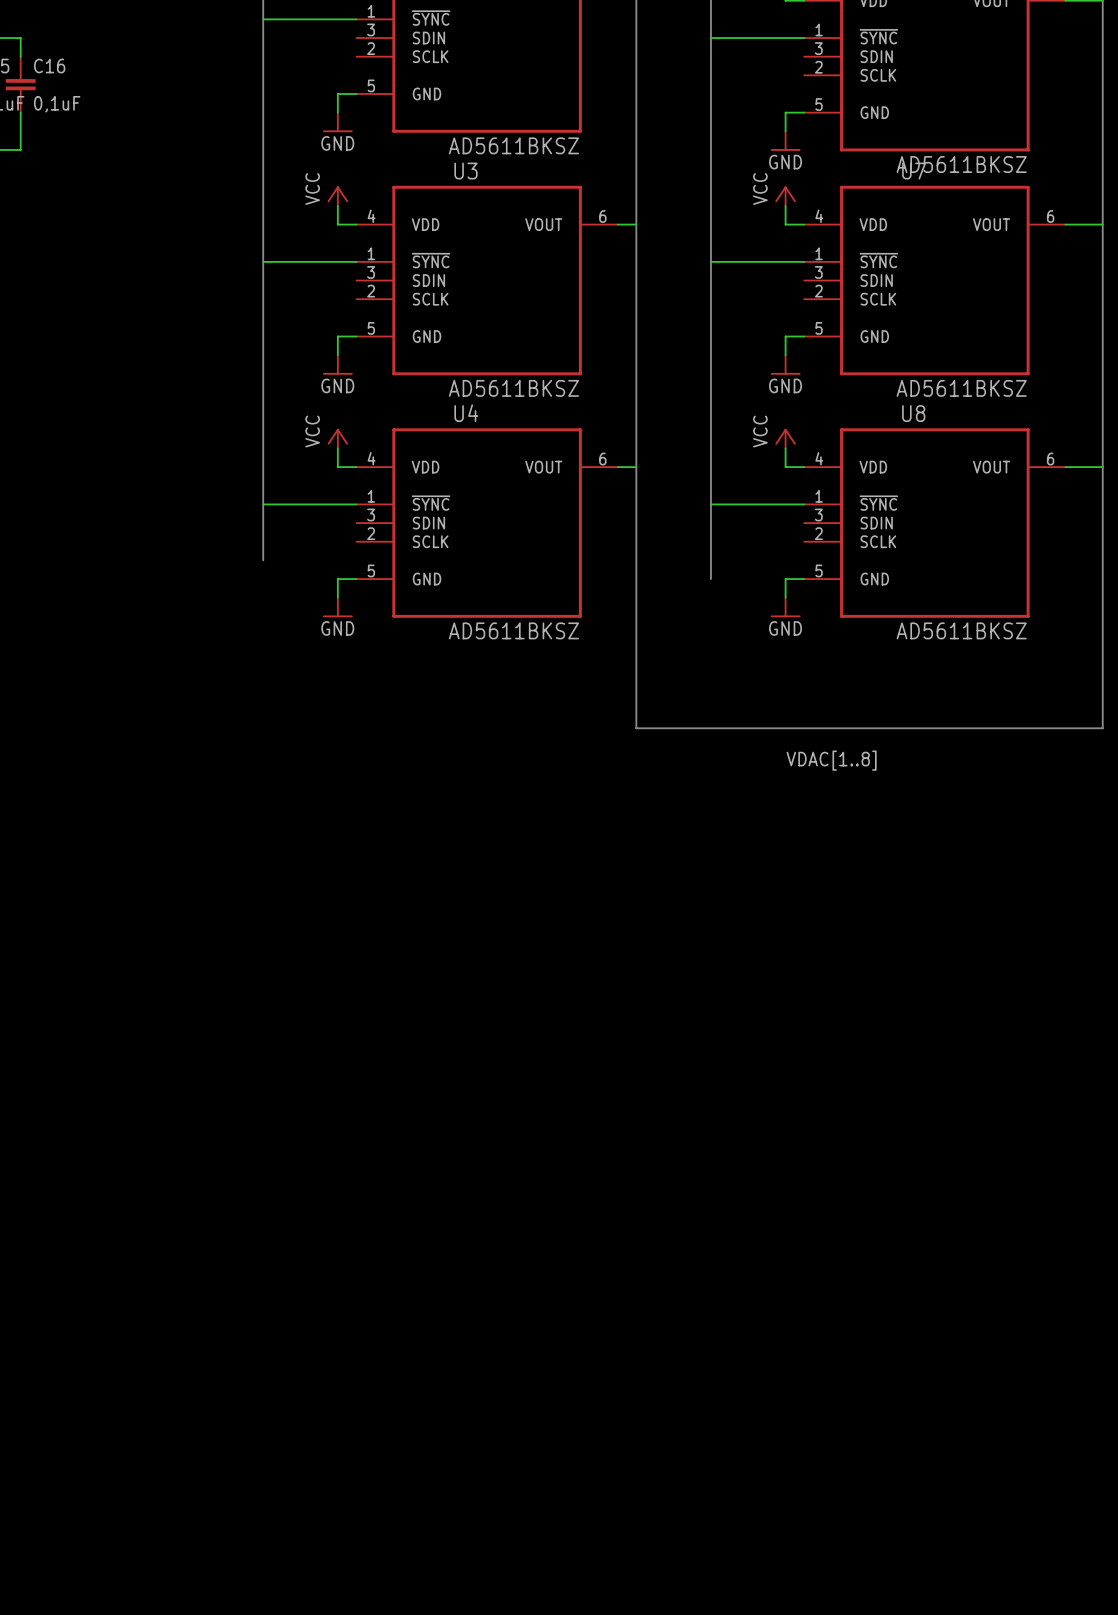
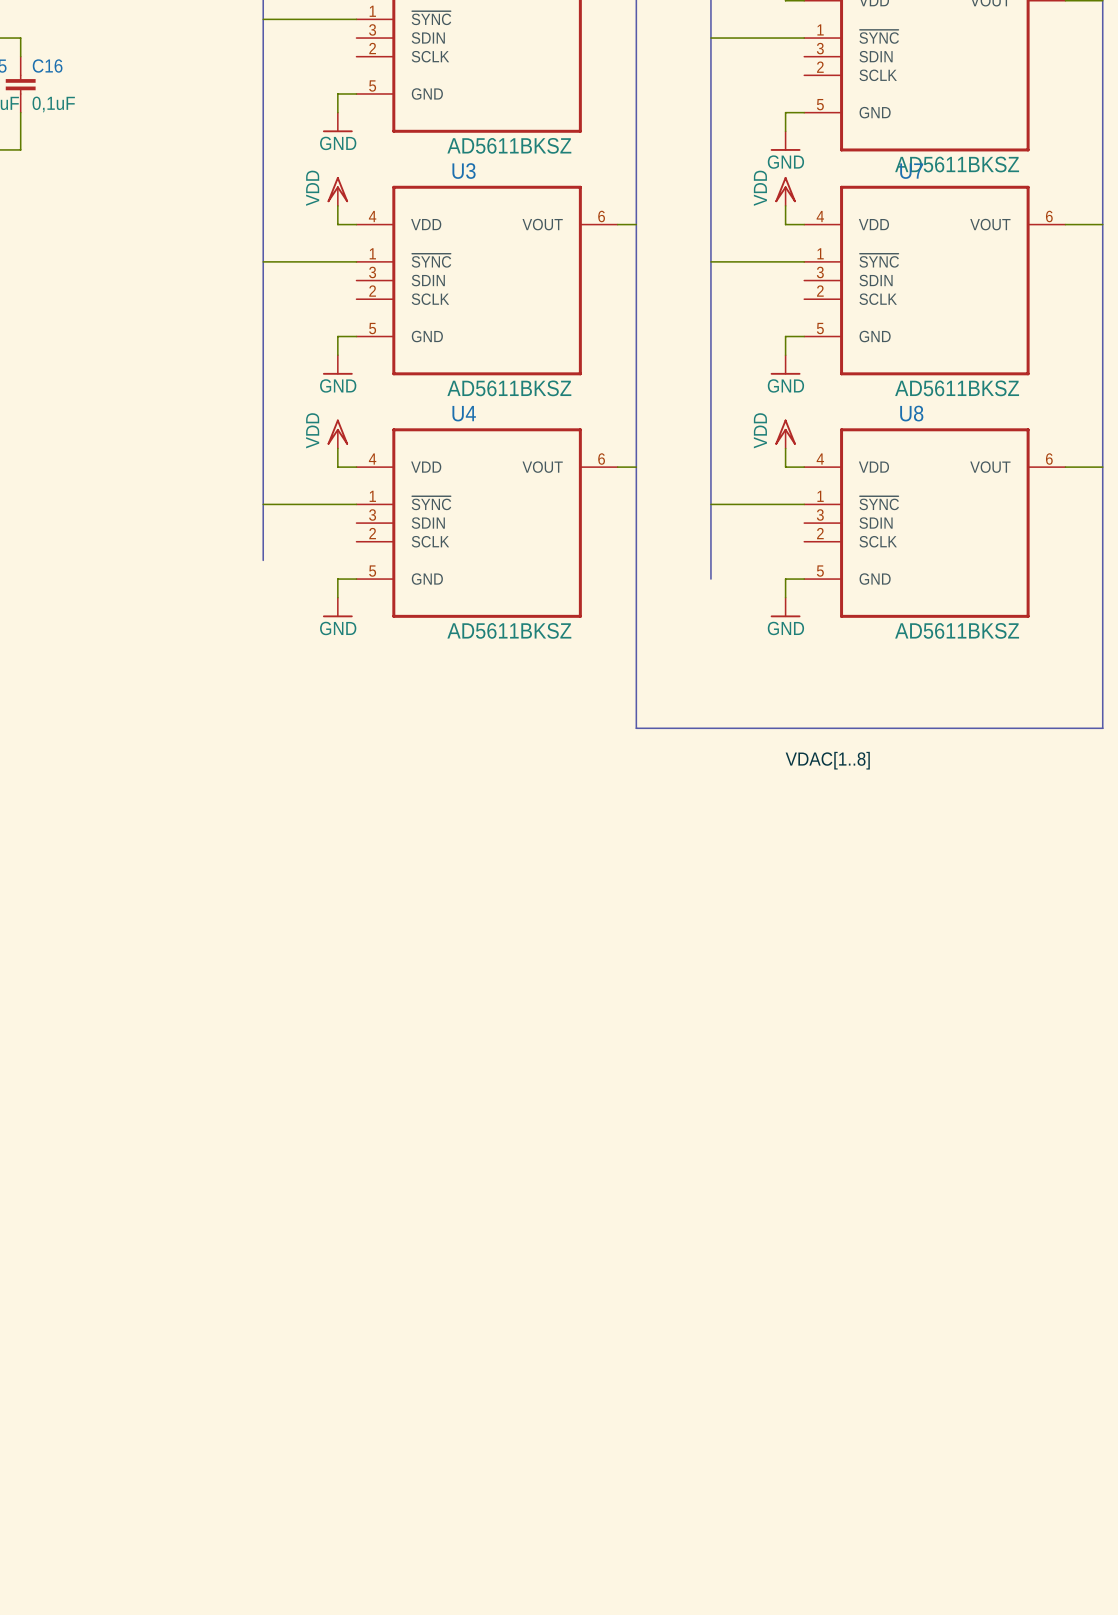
power symbol: VCC (337, 196) -> VDD (337, 191)
power symbol: VCC (785, 196) -> VDD (785, 191)
power symbol: VCC (337, 438) -> VDD (337, 433)
power symbol: VCC (785, 438) -> VDD (785, 433)

